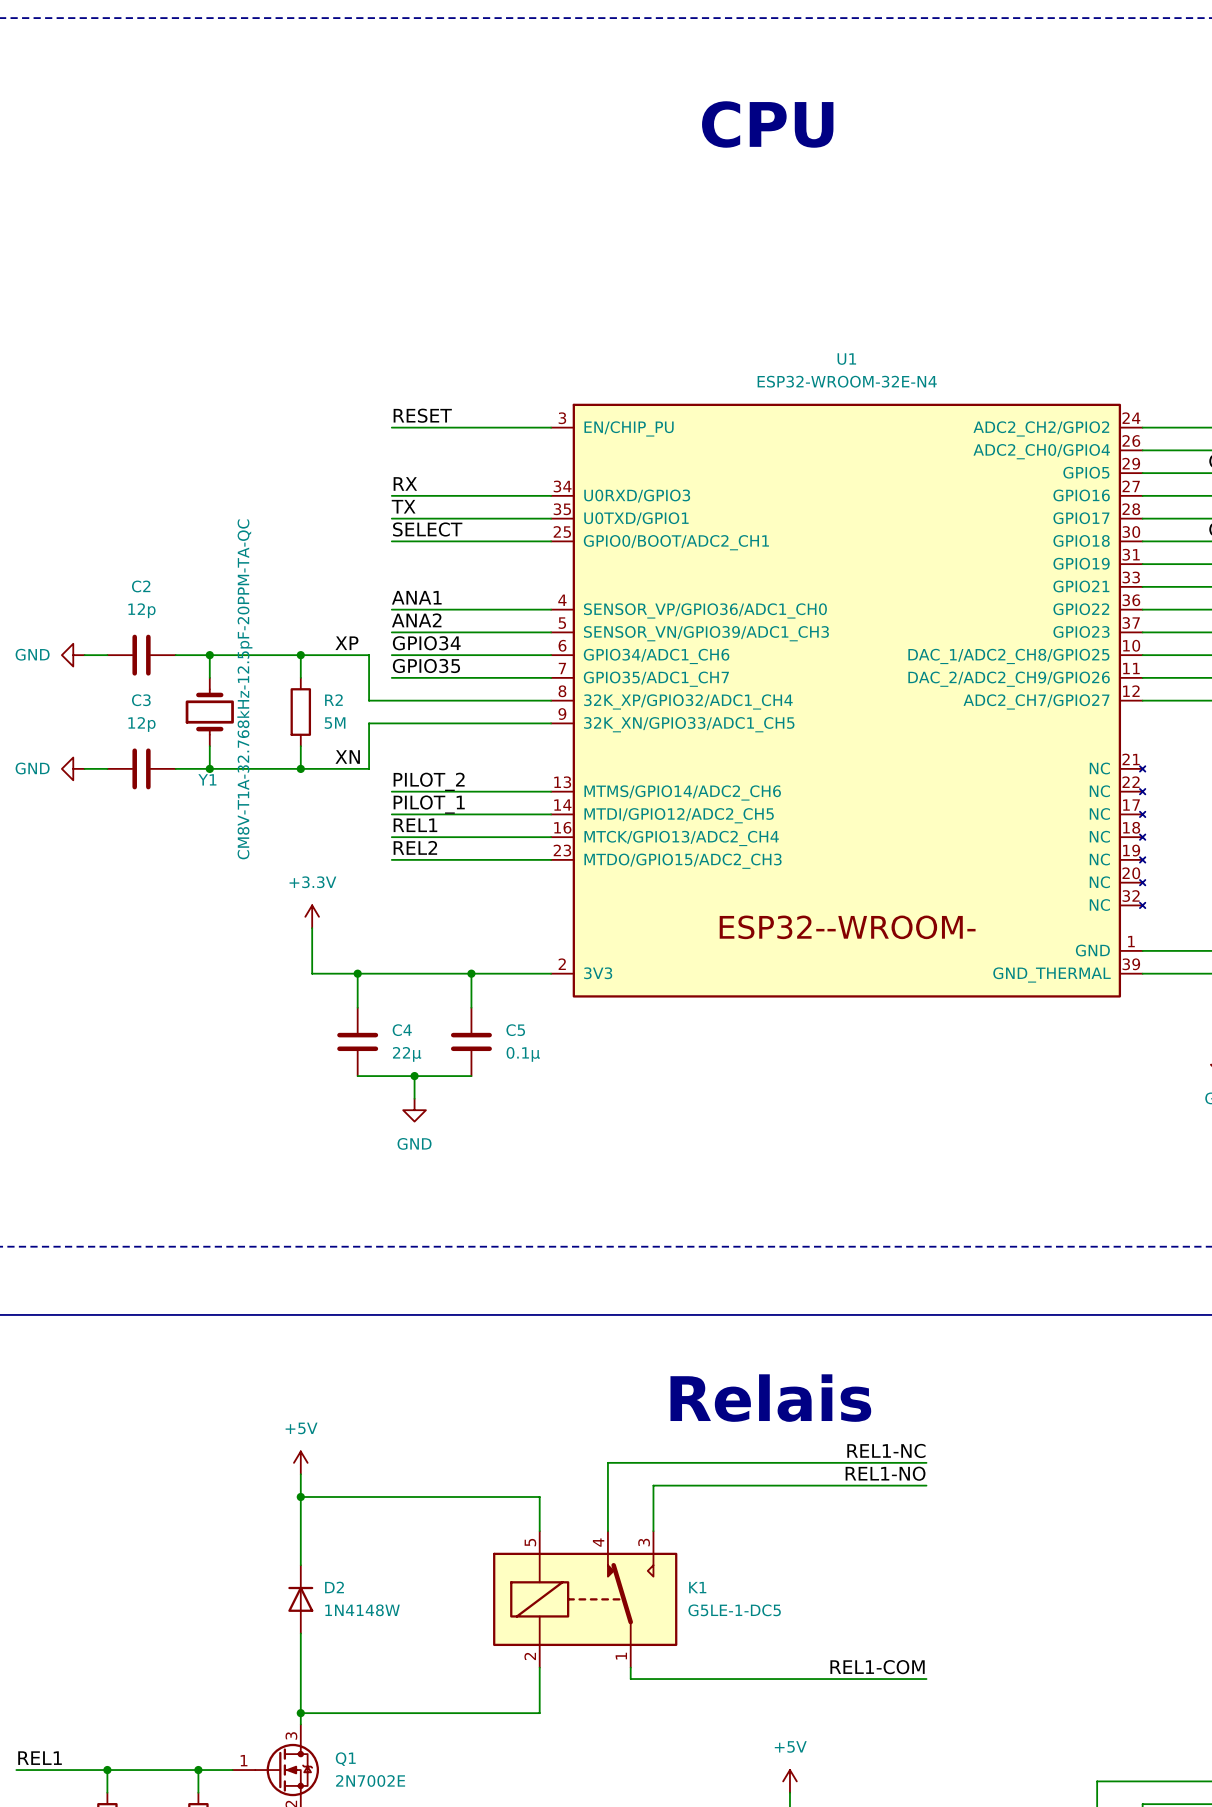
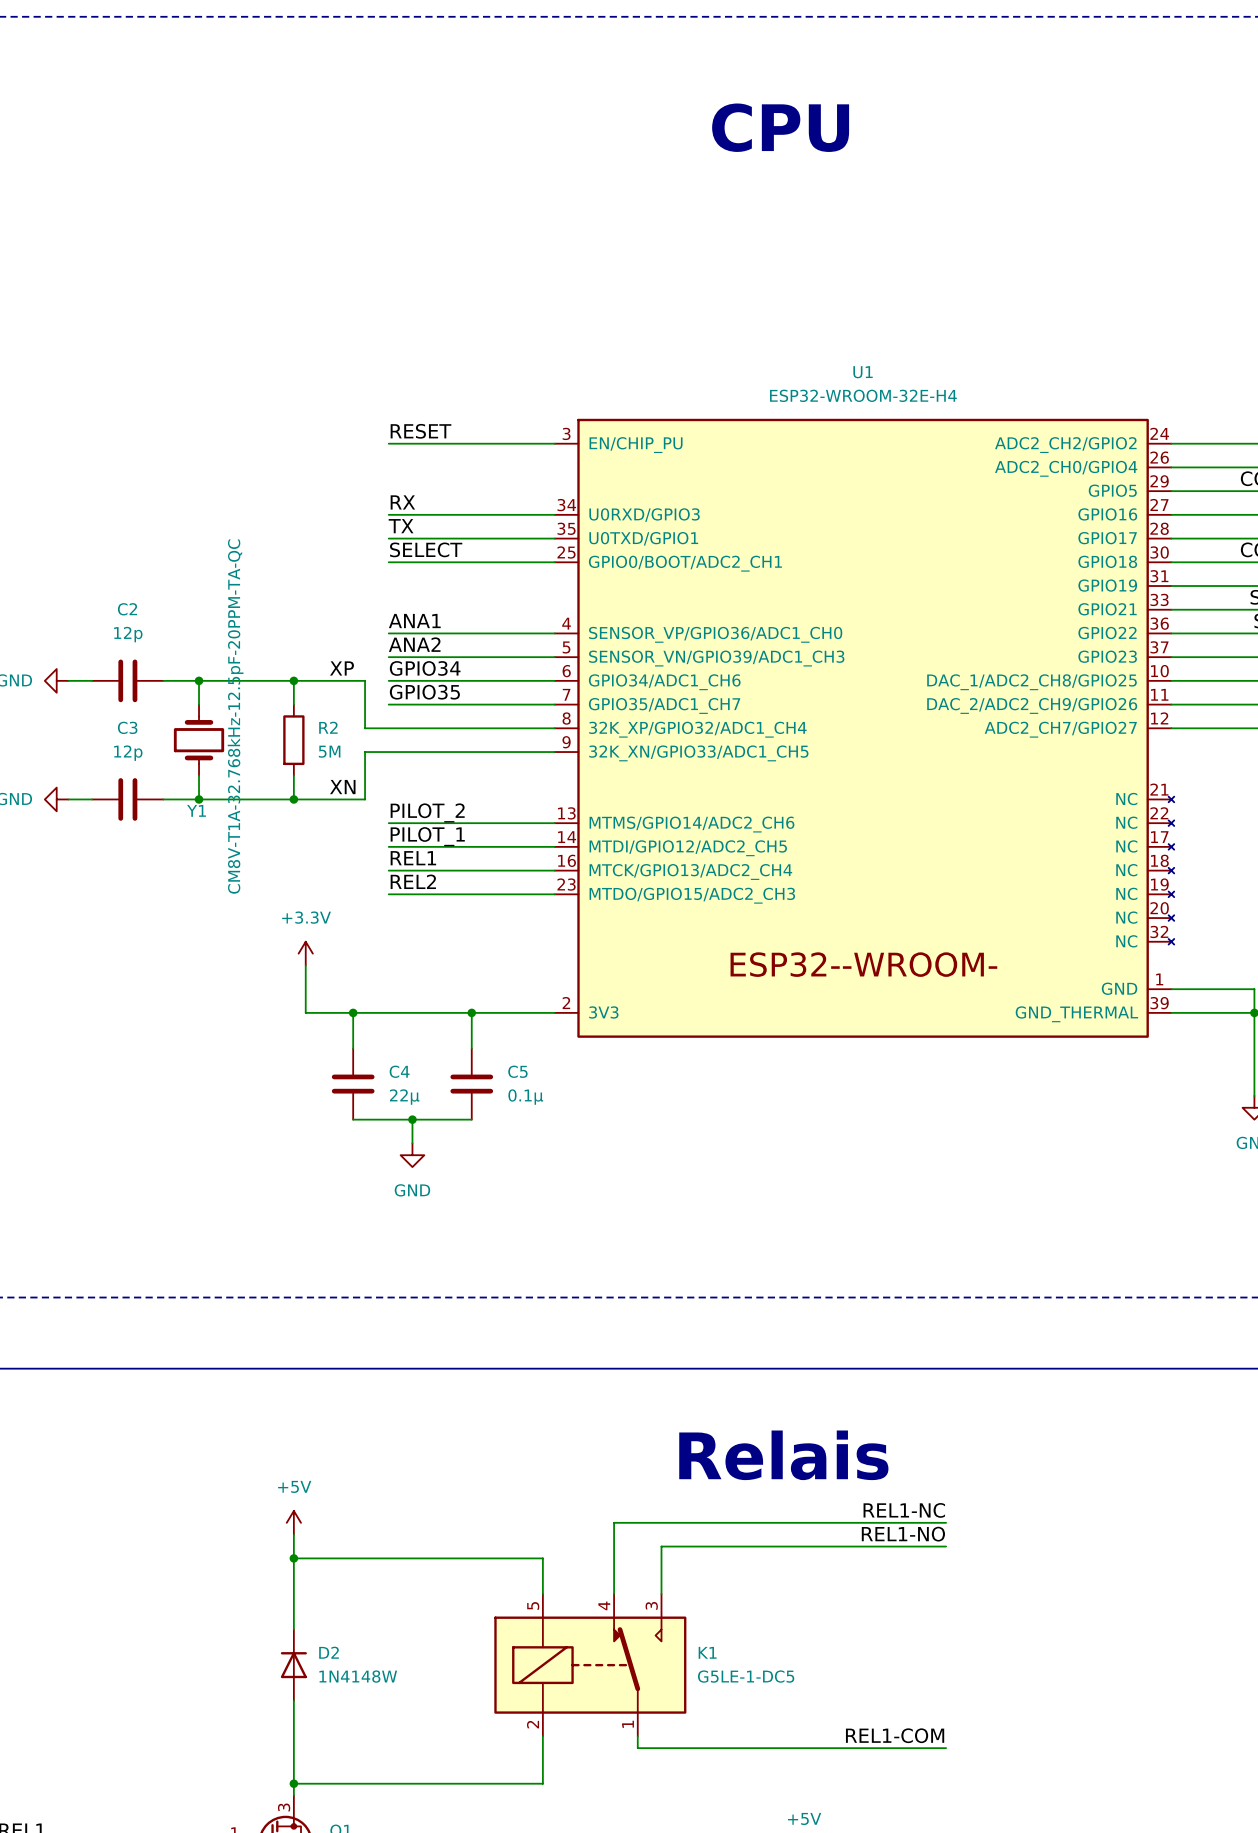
U1 value: ESP32-WROOM-32E-N4 (847, 381) -> ESP32-WROOM-32E-H4 (863, 395)

